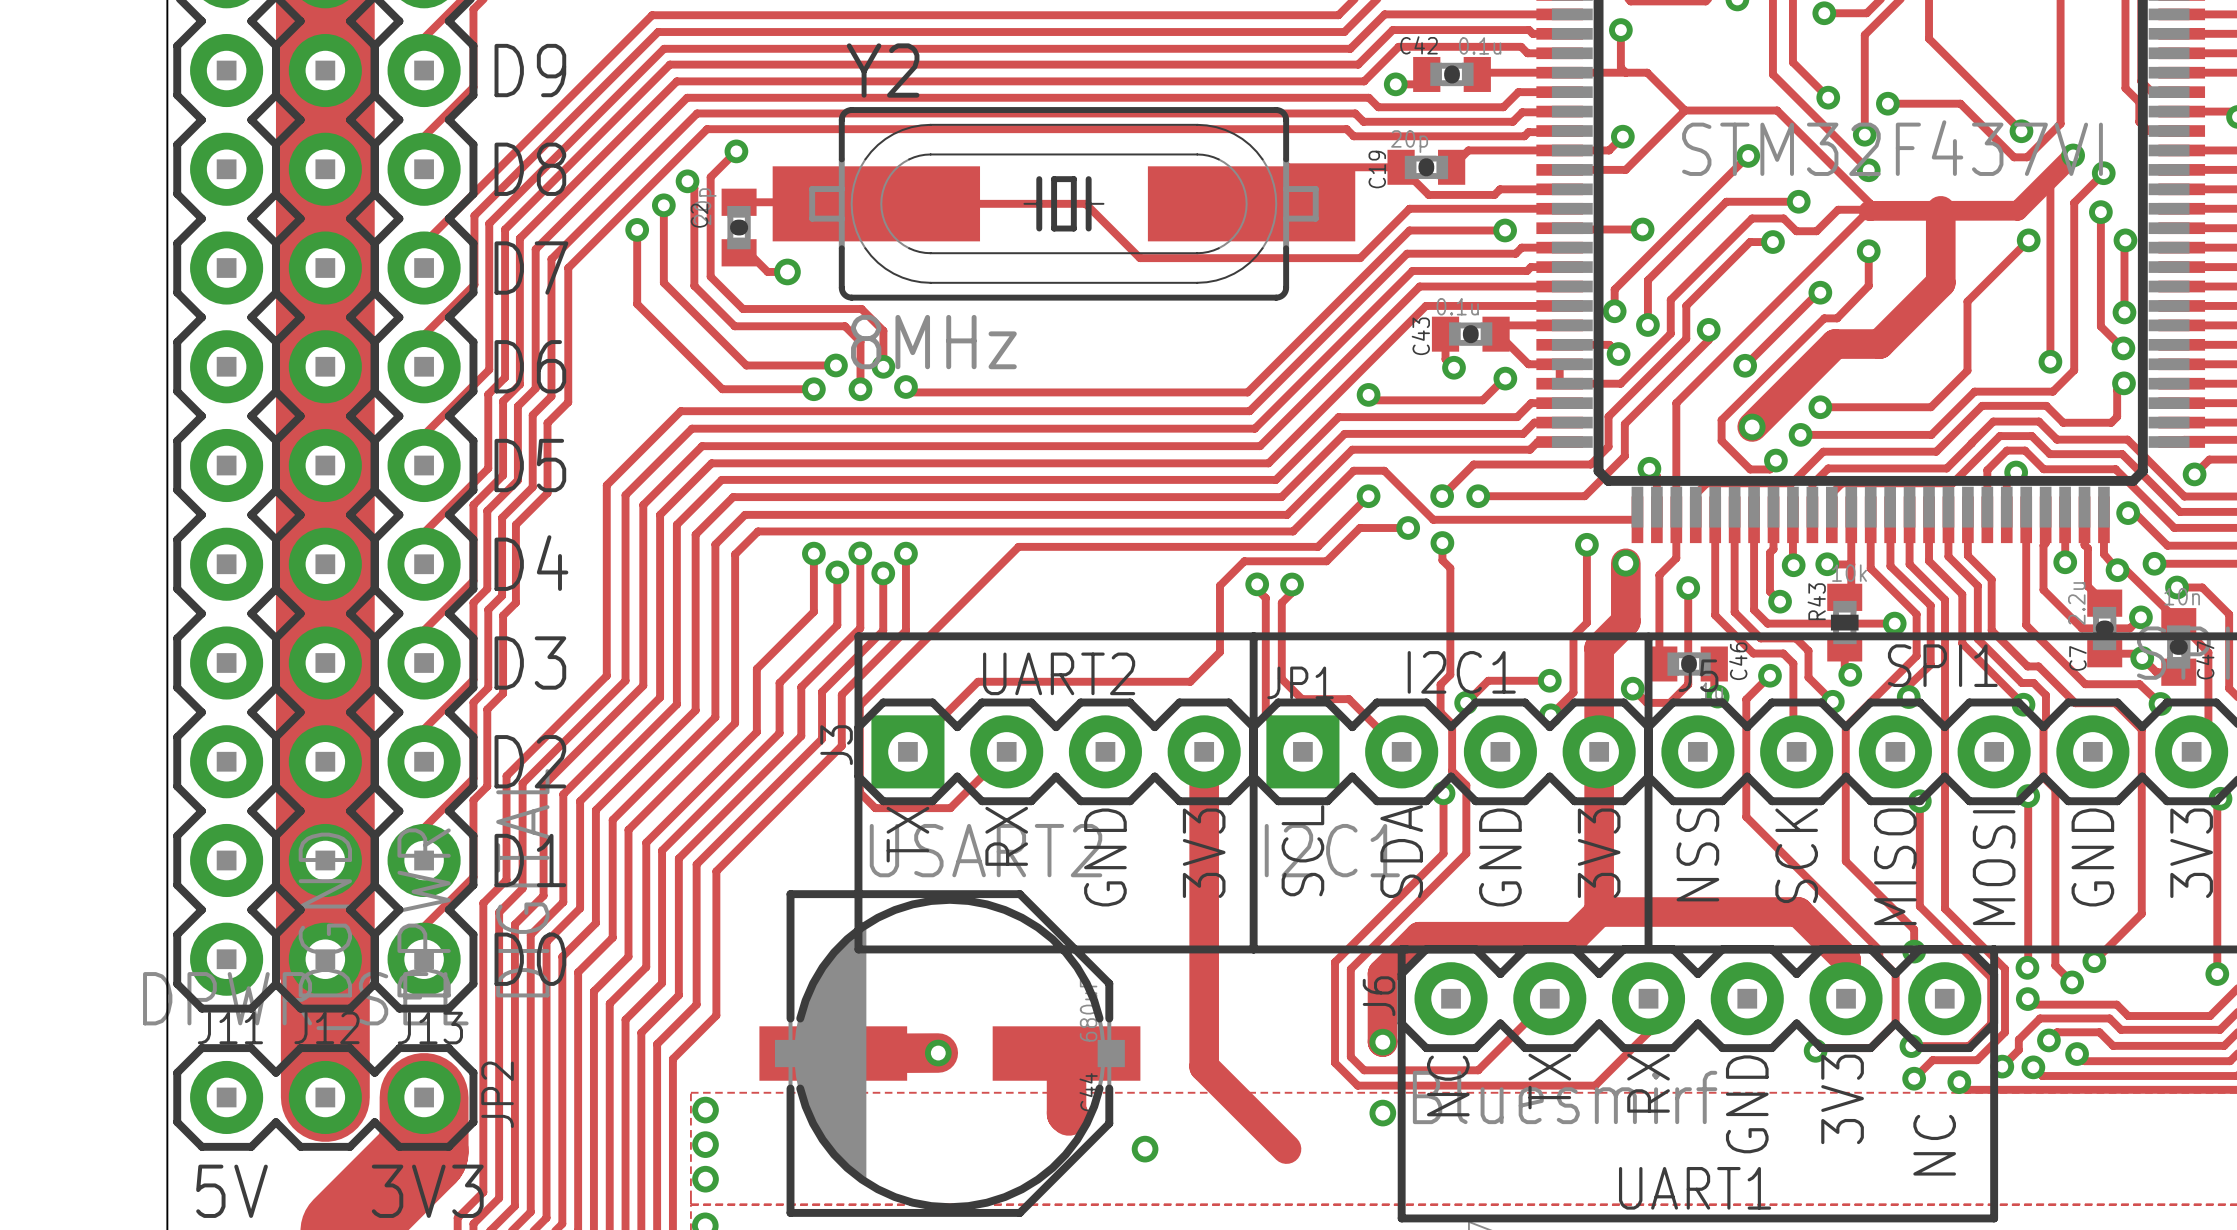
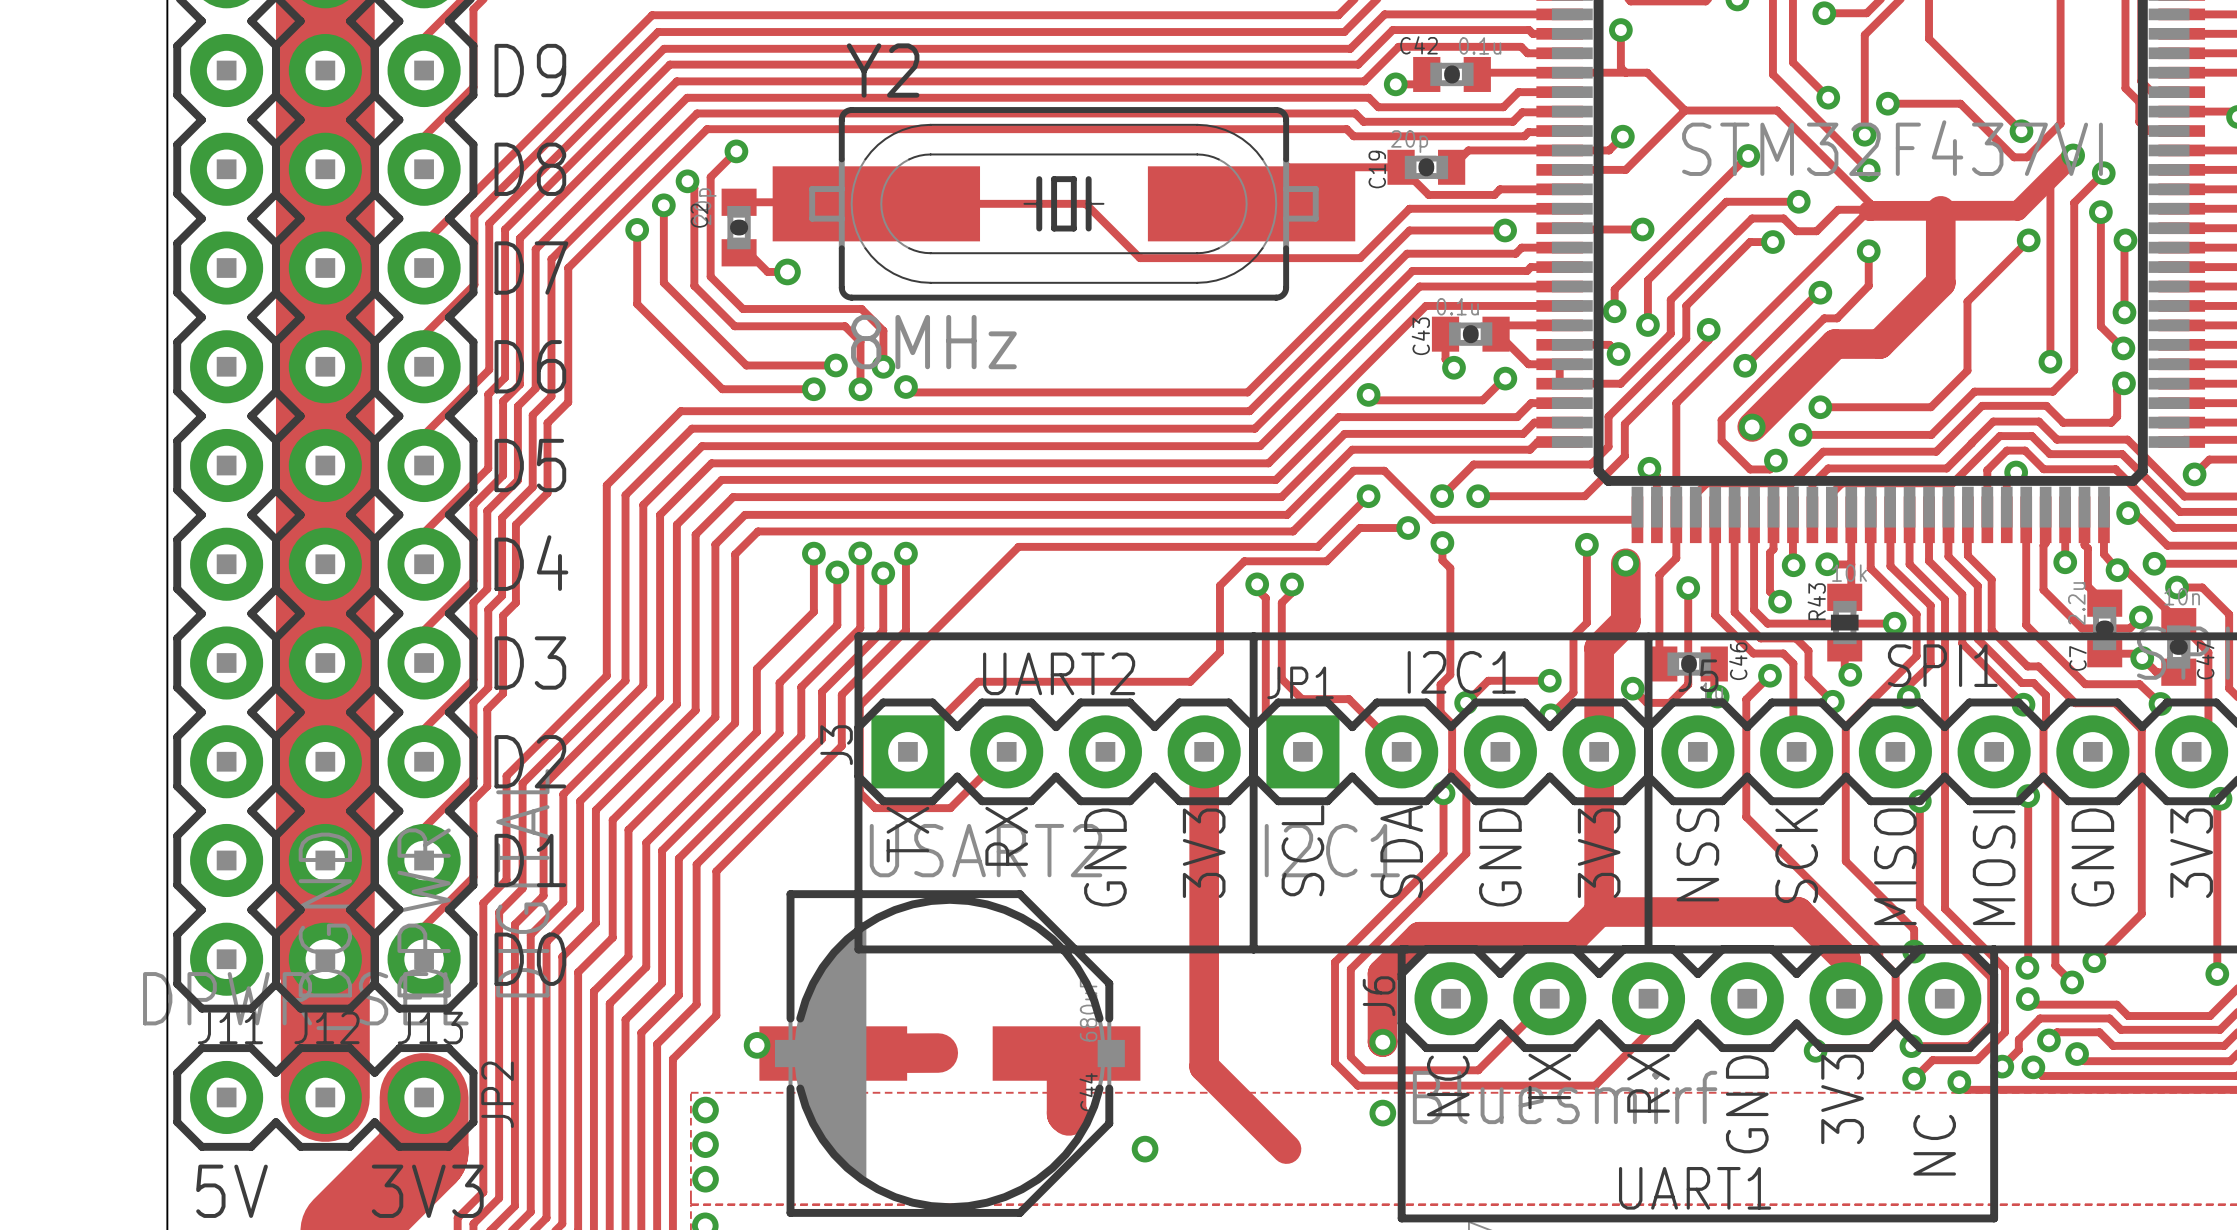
via position: (938, 1053) -> (757, 1045)

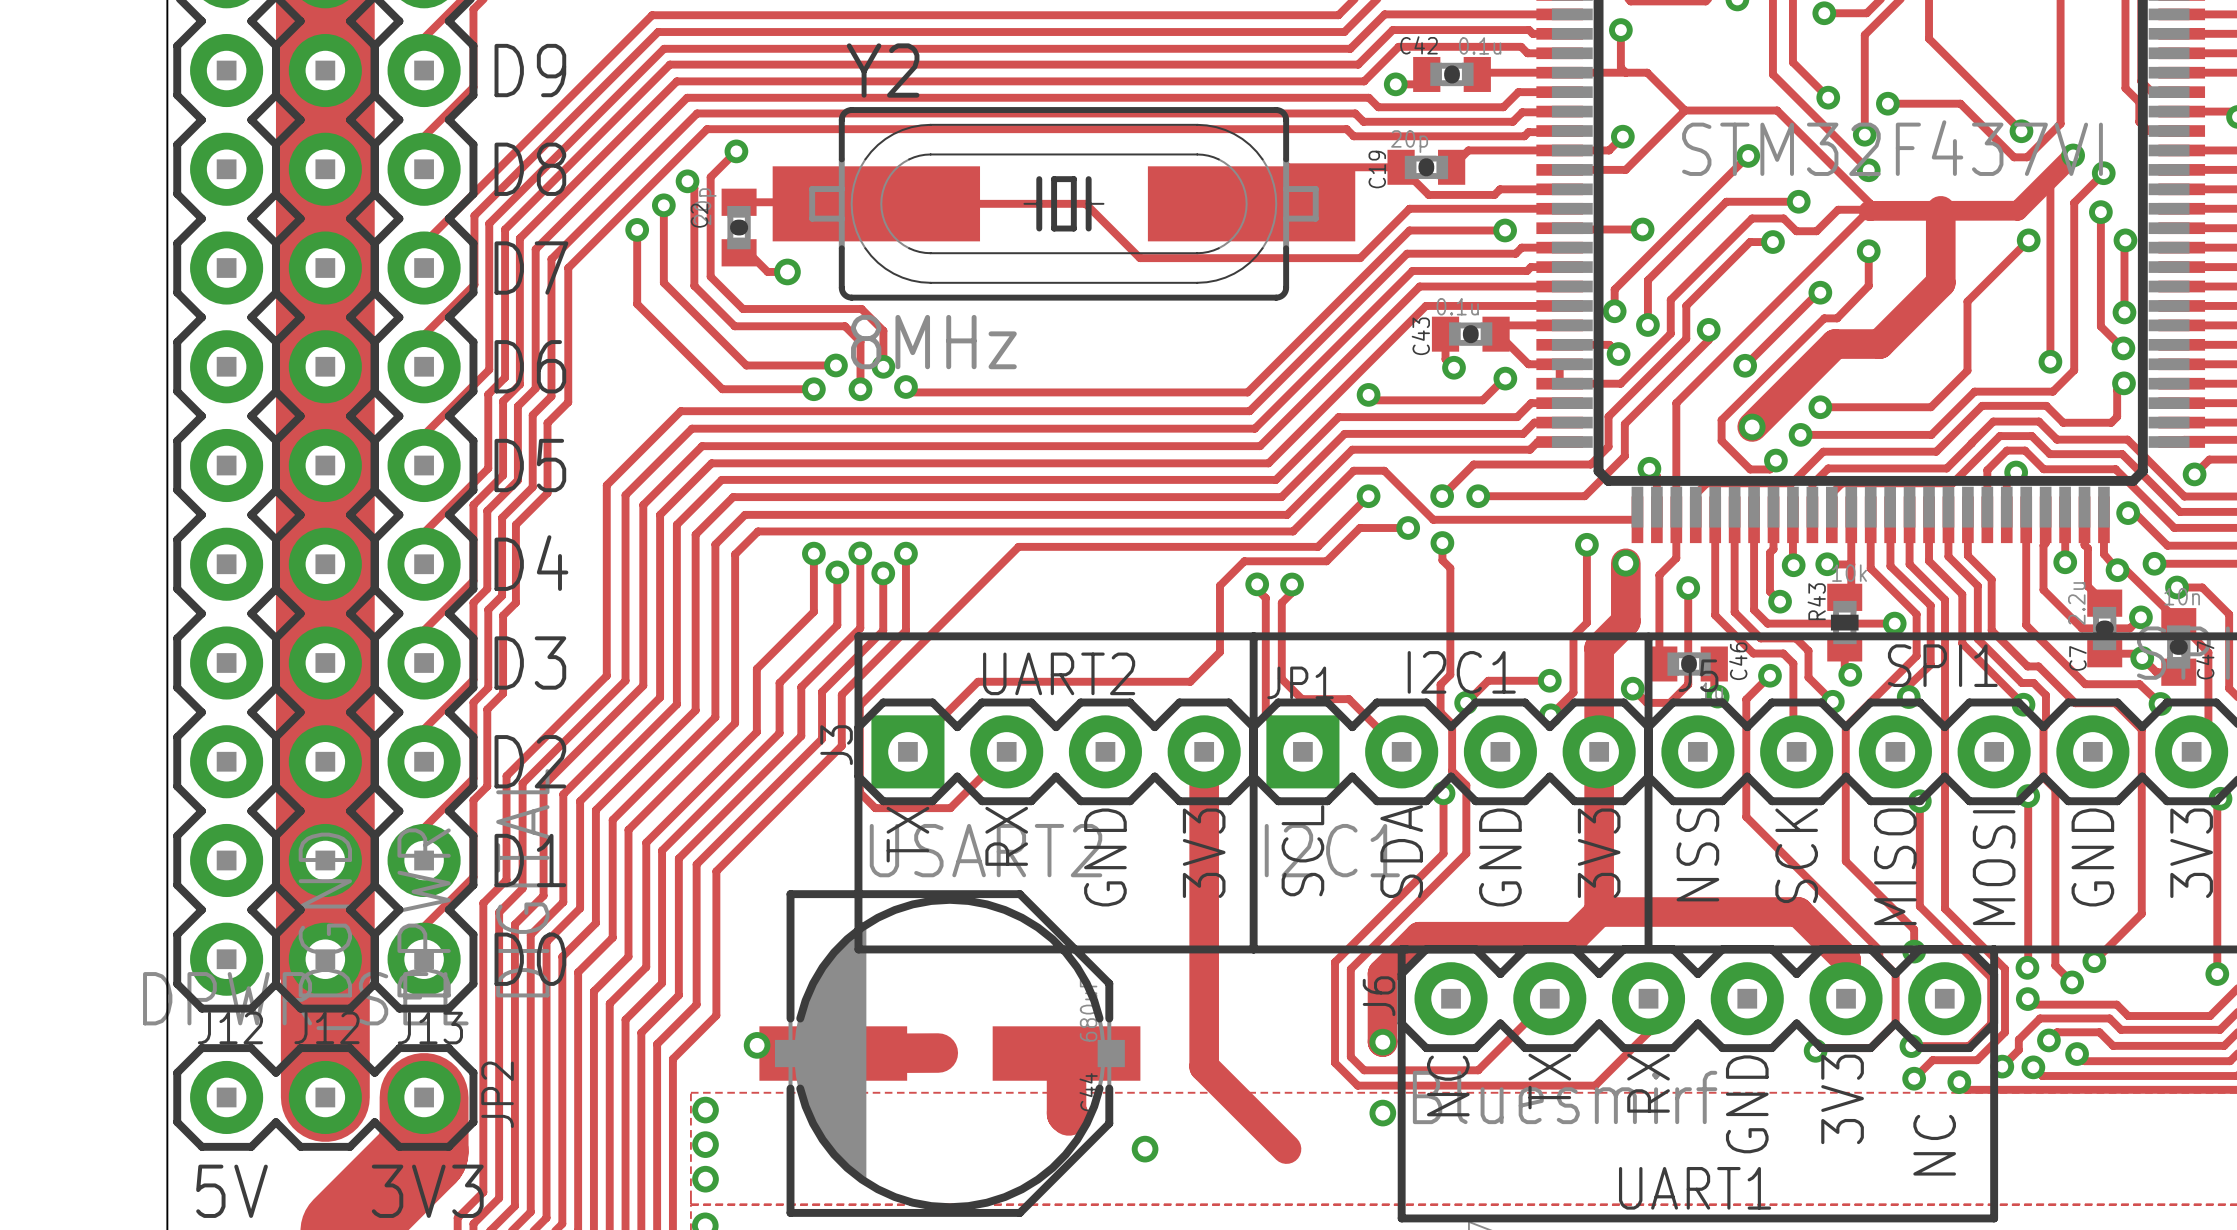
J11 name: J11 (230, 1027) -> J12 (230, 1027)

